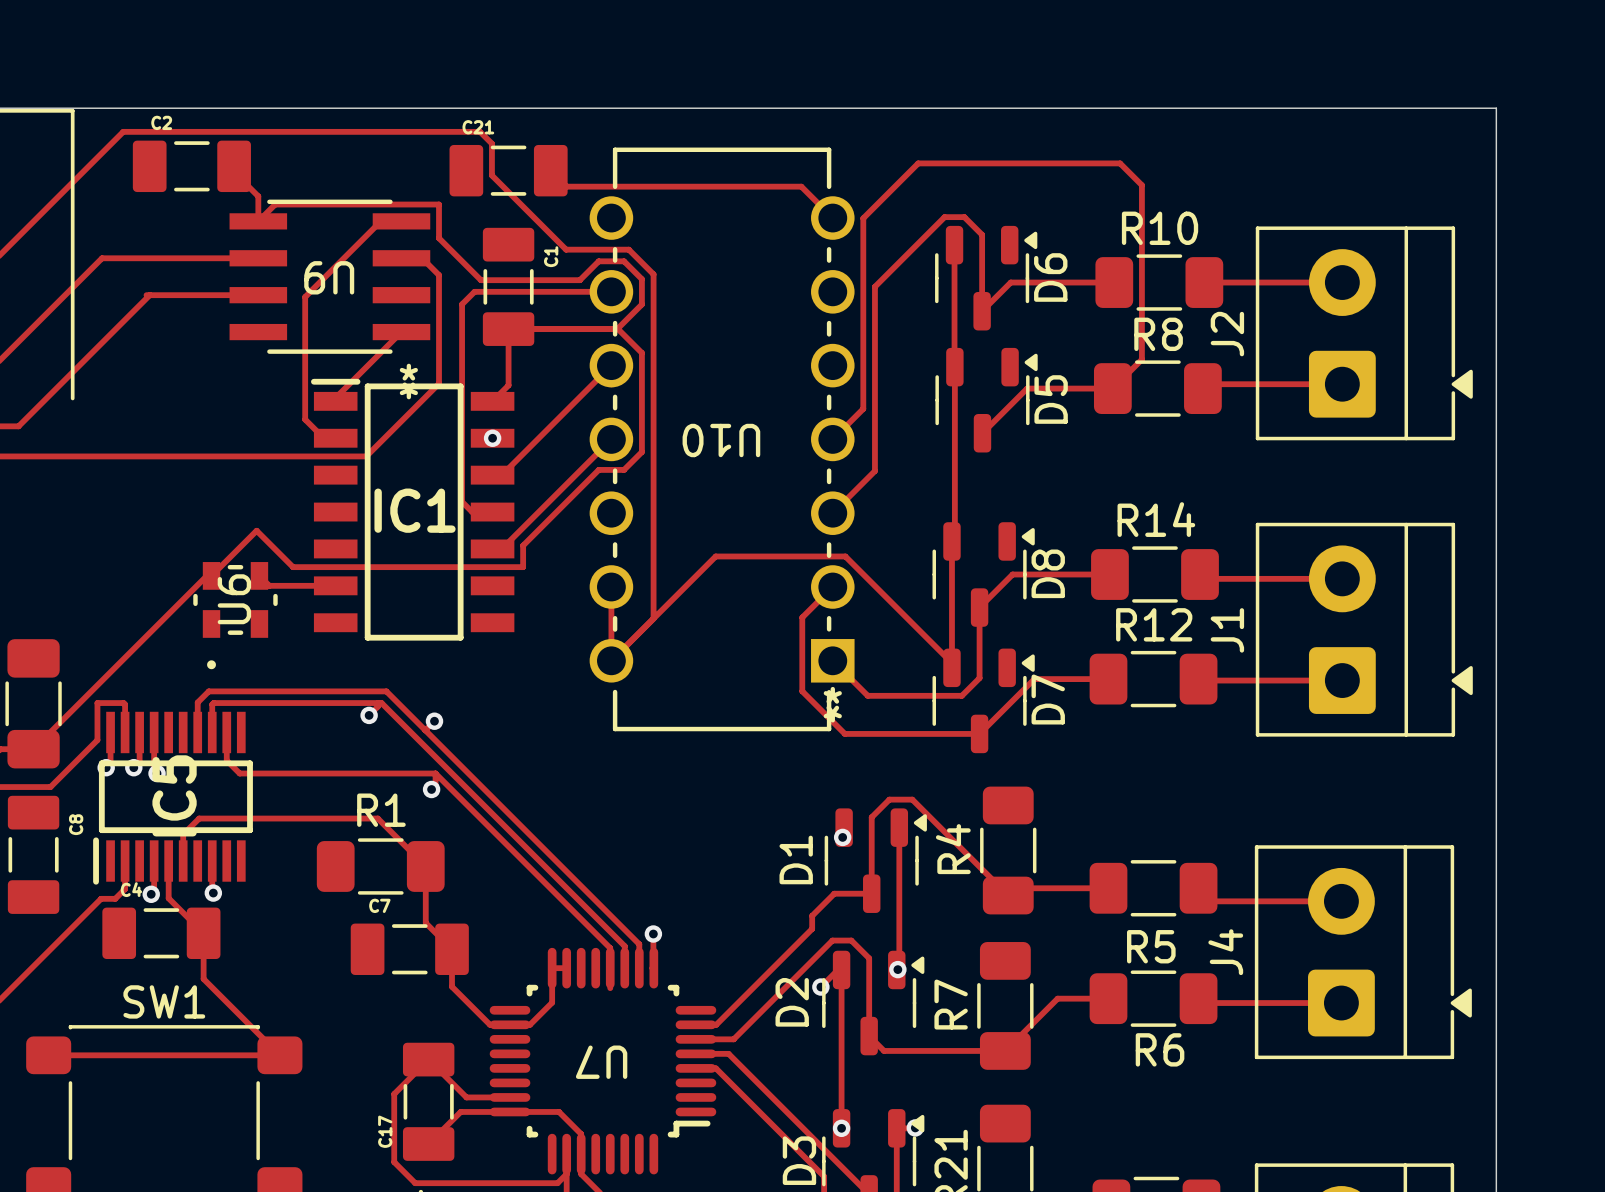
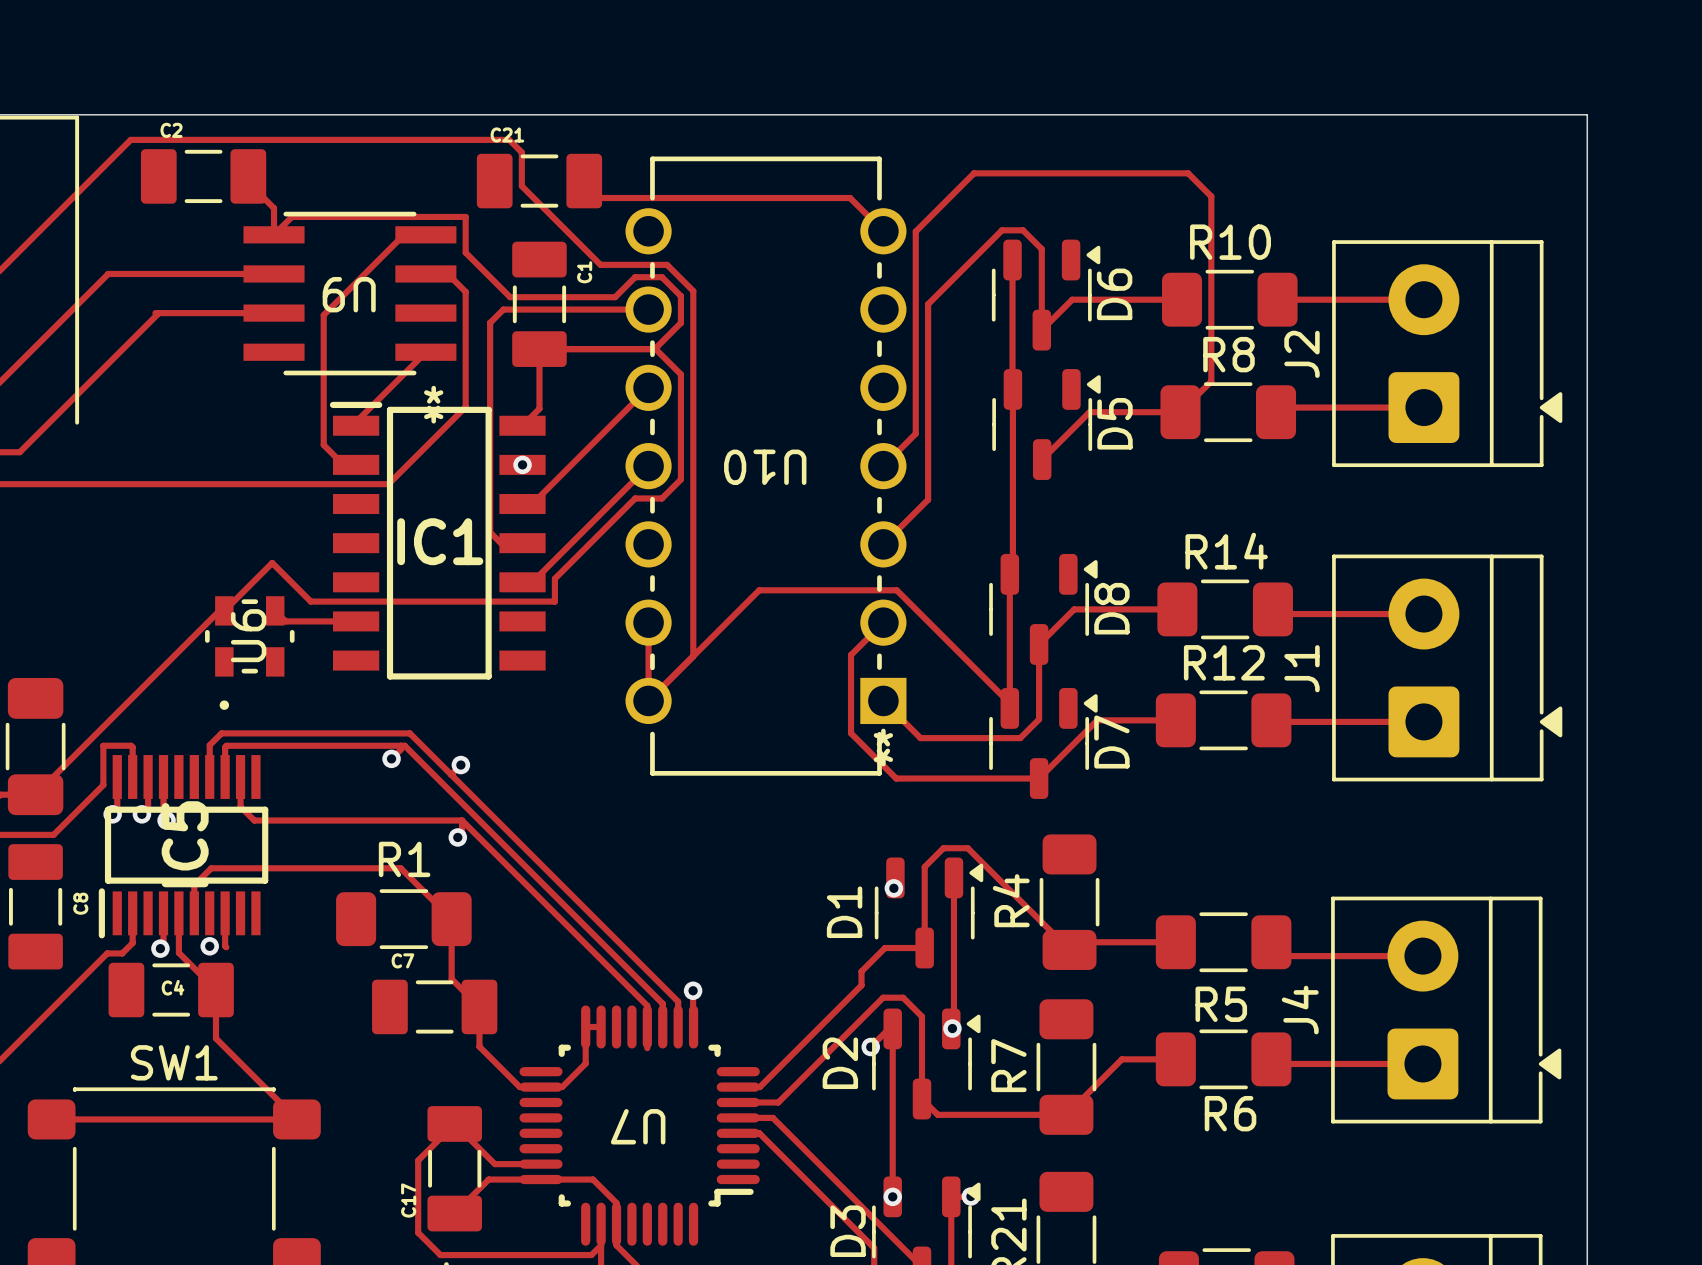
C8 name position: C8 (76, 824) -> C8 (80, 903)
C4 name position: C4 (131, 889) -> C4 (173, 987)
via position: (213, 893) -> (209, 946)

